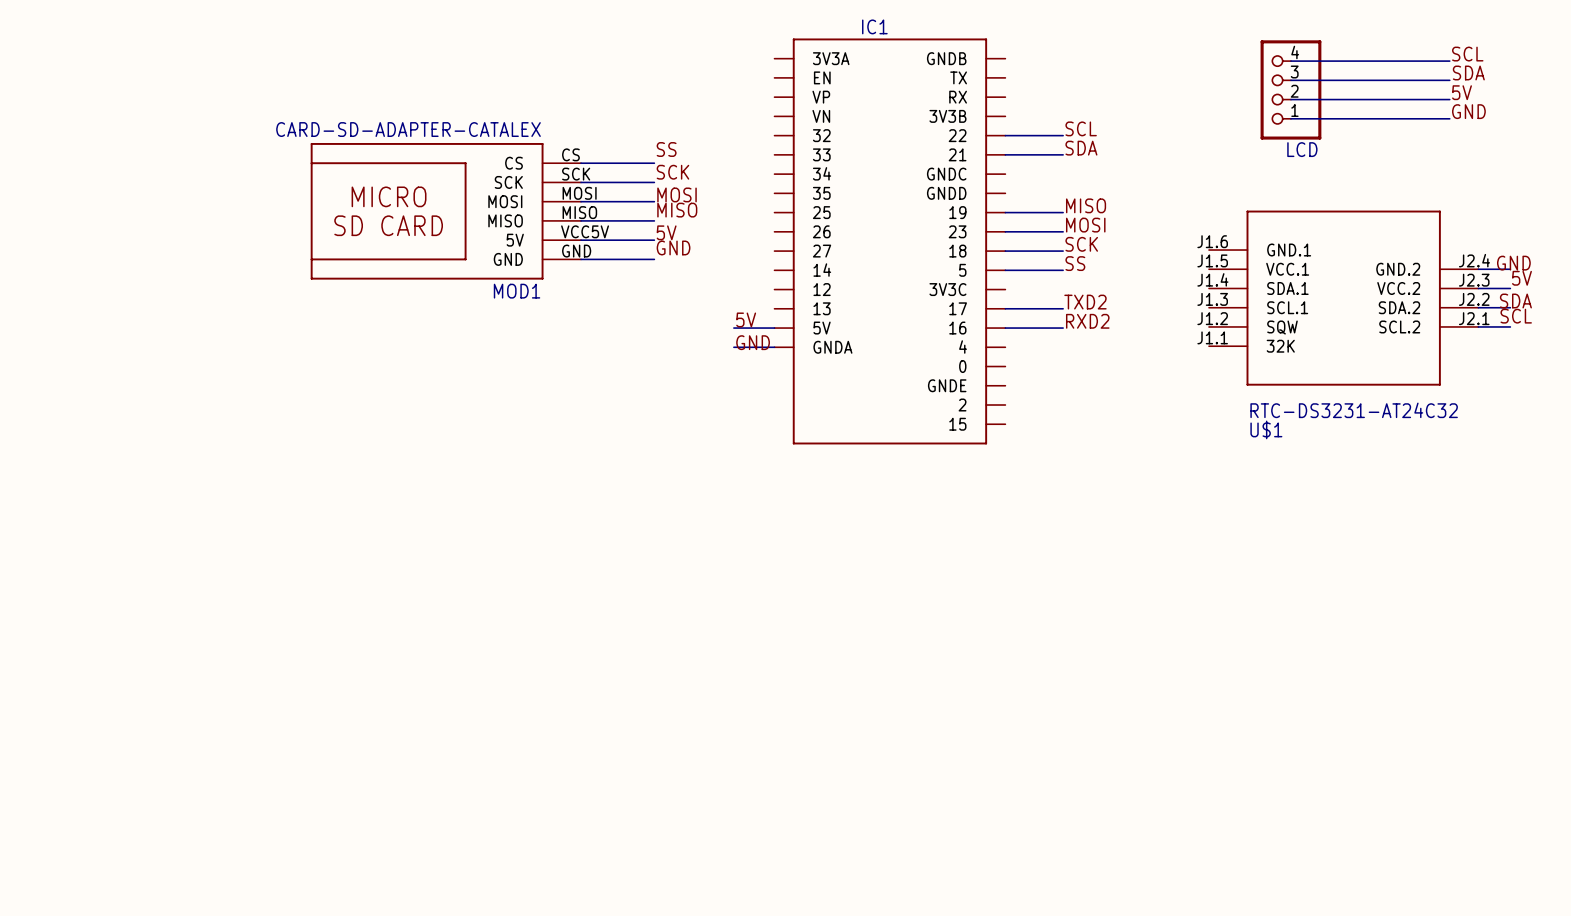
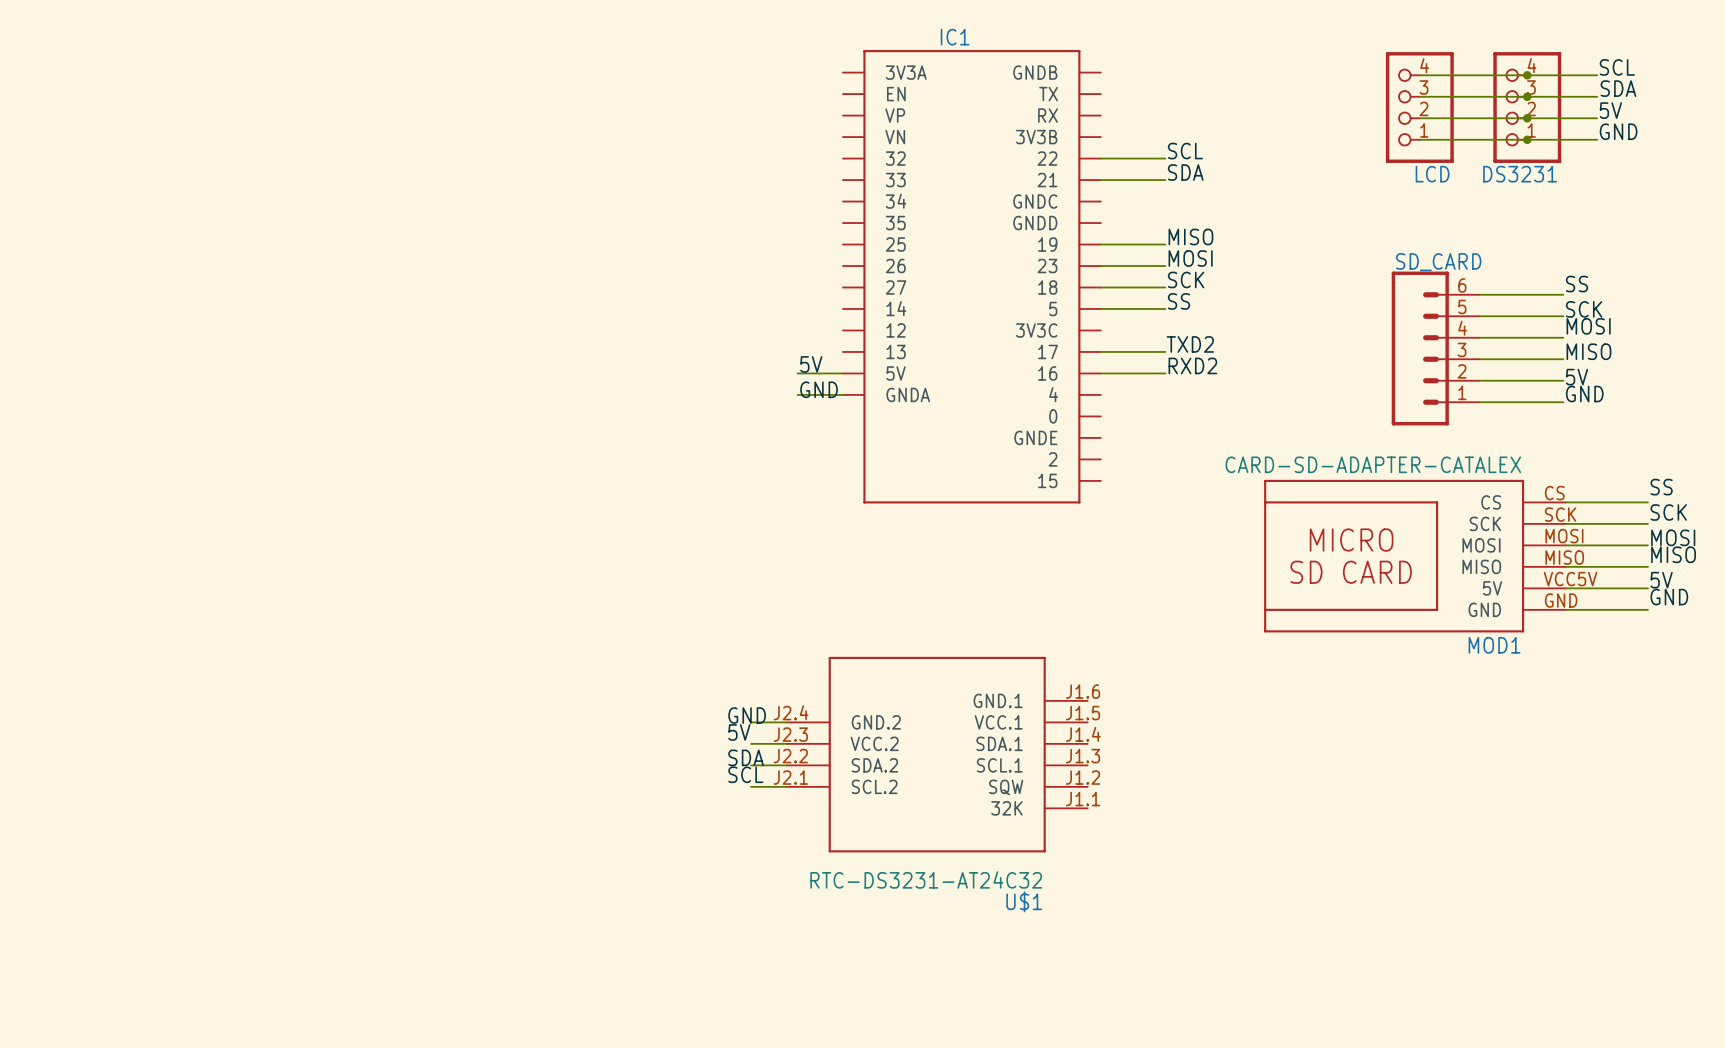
junction: none -> (1527, 75)
junction: none -> (1527, 96)
DS3231: none -> (1527, 107)
junction: none -> (1527, 118)
junction: none -> (1527, 139)
label: SS (666, 149) -> none
wire: (581, 163) (654, 163) -> none
label: SCK (672, 172) -> none
wire: (581, 182) (654, 182) -> none
label: MOSI (677, 194) -> none
wire: (581, 201) (654, 201) -> none
label: MISO (677, 210) -> none
MOD1 position: (445, 211) -> (1415, 556)
wire: (581, 220) (654, 220) -> none
label: 5V (666, 232) -> none
wire: (581, 240) (654, 240) -> none
label: GND (673, 247) -> none
label: none -> SS (1577, 284)
wire: none -> (1479, 294) (1563, 294)
wire: (581, 259) (654, 259) -> none
label: GND (1513, 263) -> none
wire: (1478, 269) (1510, 269) -> none
label: none -> SCK (1584, 309)
wire: none -> (1479, 316) (1563, 316)
label: 5V (1521, 278) -> none
label: none -> MOSI (1588, 326)
wire: (1478, 288) (1510, 288) -> none
wire: none -> (1479, 337) (1563, 337)
U$1 flip: as is (1343, 298) -> left-right (937, 754)
U$1 position: (1343, 298) -> (937, 754)
label: SDA (1515, 301) -> none
SD_CARD: none -> (1435, 348)
wire: (1478, 307) (1510, 307) -> none
label: none -> MISO (1588, 351)
wire: none -> (1479, 359) (1563, 359)
label: SCL (1516, 316) -> none
wire: (1478, 326) (1510, 326) -> none
label: none -> 5V (1577, 377)
wire: none -> (1479, 380) (1563, 380)
label: none -> GND (1584, 394)
wire: none -> (1479, 402) (1563, 402)
label: none -> SS (1661, 487)
wire: none -> (1566, 502) (1647, 502)
label: none -> SCK (1668, 512)
wire: none -> (1566, 523) (1647, 523)
label: none -> MOSI (1673, 537)
wire: none -> (1566, 545) (1647, 545)
label: none -> MISO (1673, 554)
wire: none -> (1566, 566) (1647, 566)
label: none -> 5V (1661, 580)
wire: none -> (1566, 588) (1647, 588)
label: none -> GND (1669, 597)
wire: none -> (1566, 609) (1647, 609)
label: none -> GND (747, 715)
wire: none -> (751, 722) (786, 722)
label: none -> 5V (739, 732)
wire: none -> (751, 743) (786, 743)
label: none -> SDA (746, 757)
wire: none -> (751, 765) (786, 765)
label: none -> SCL (745, 774)
wire: none -> (751, 786) (786, 786)

